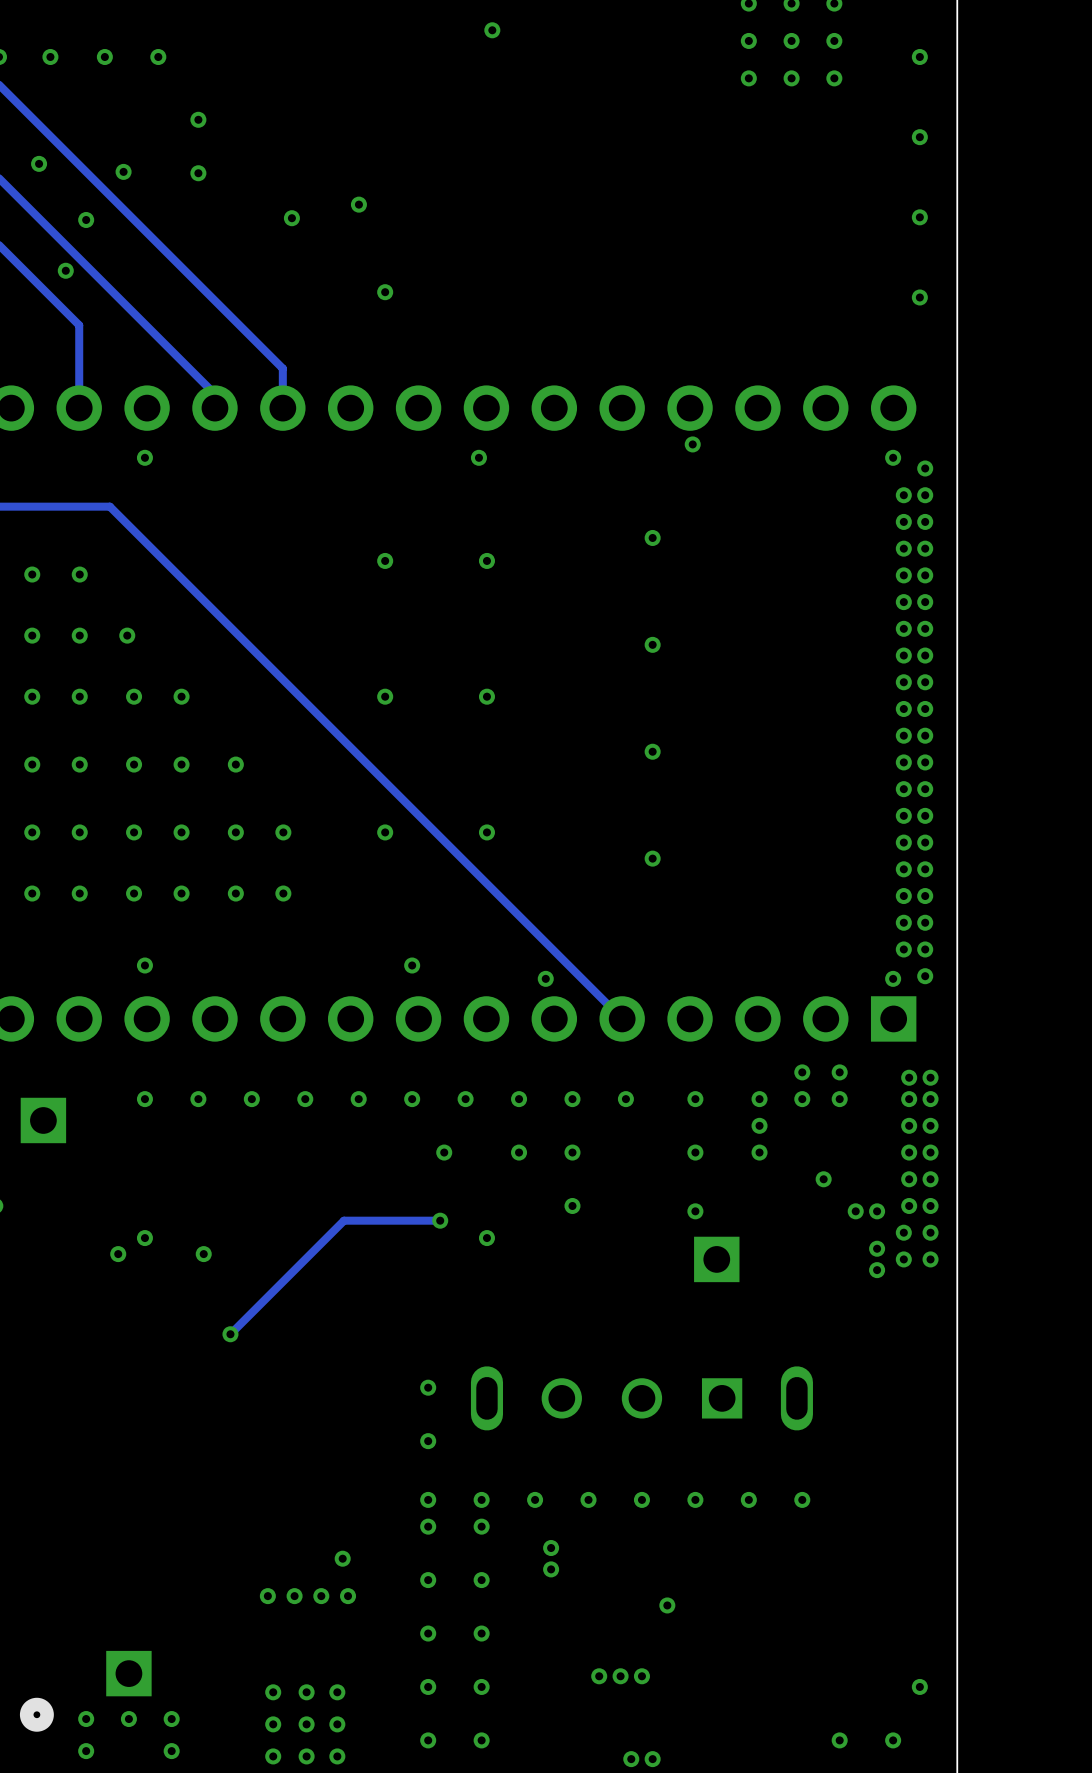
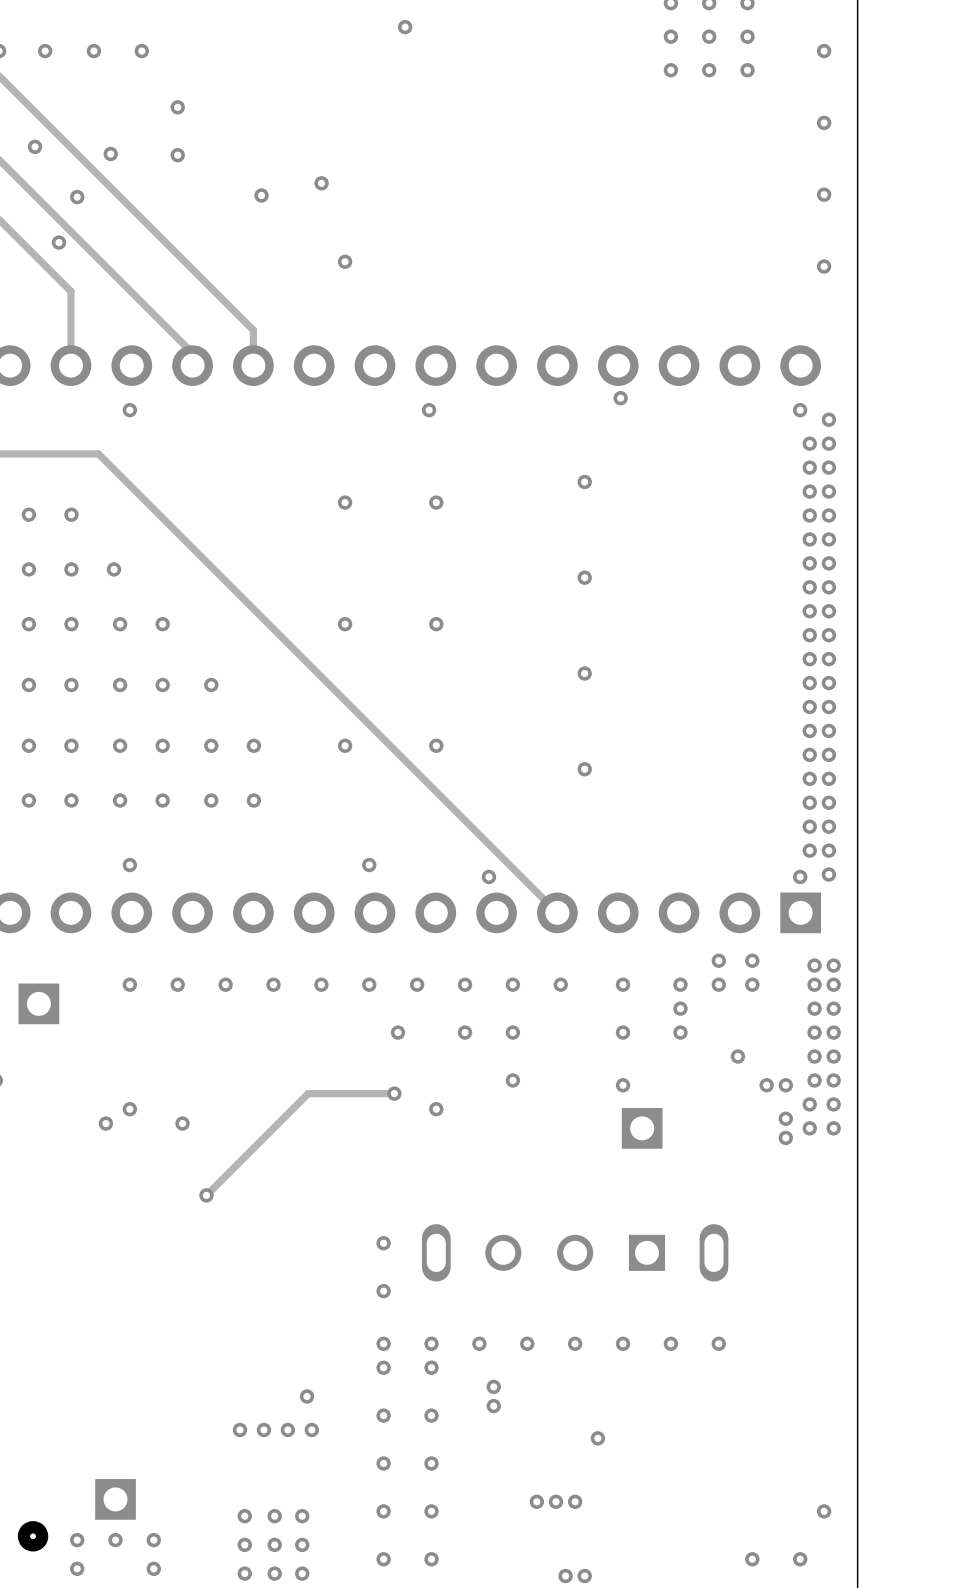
via position: (492, 30) -> (405, 27)

